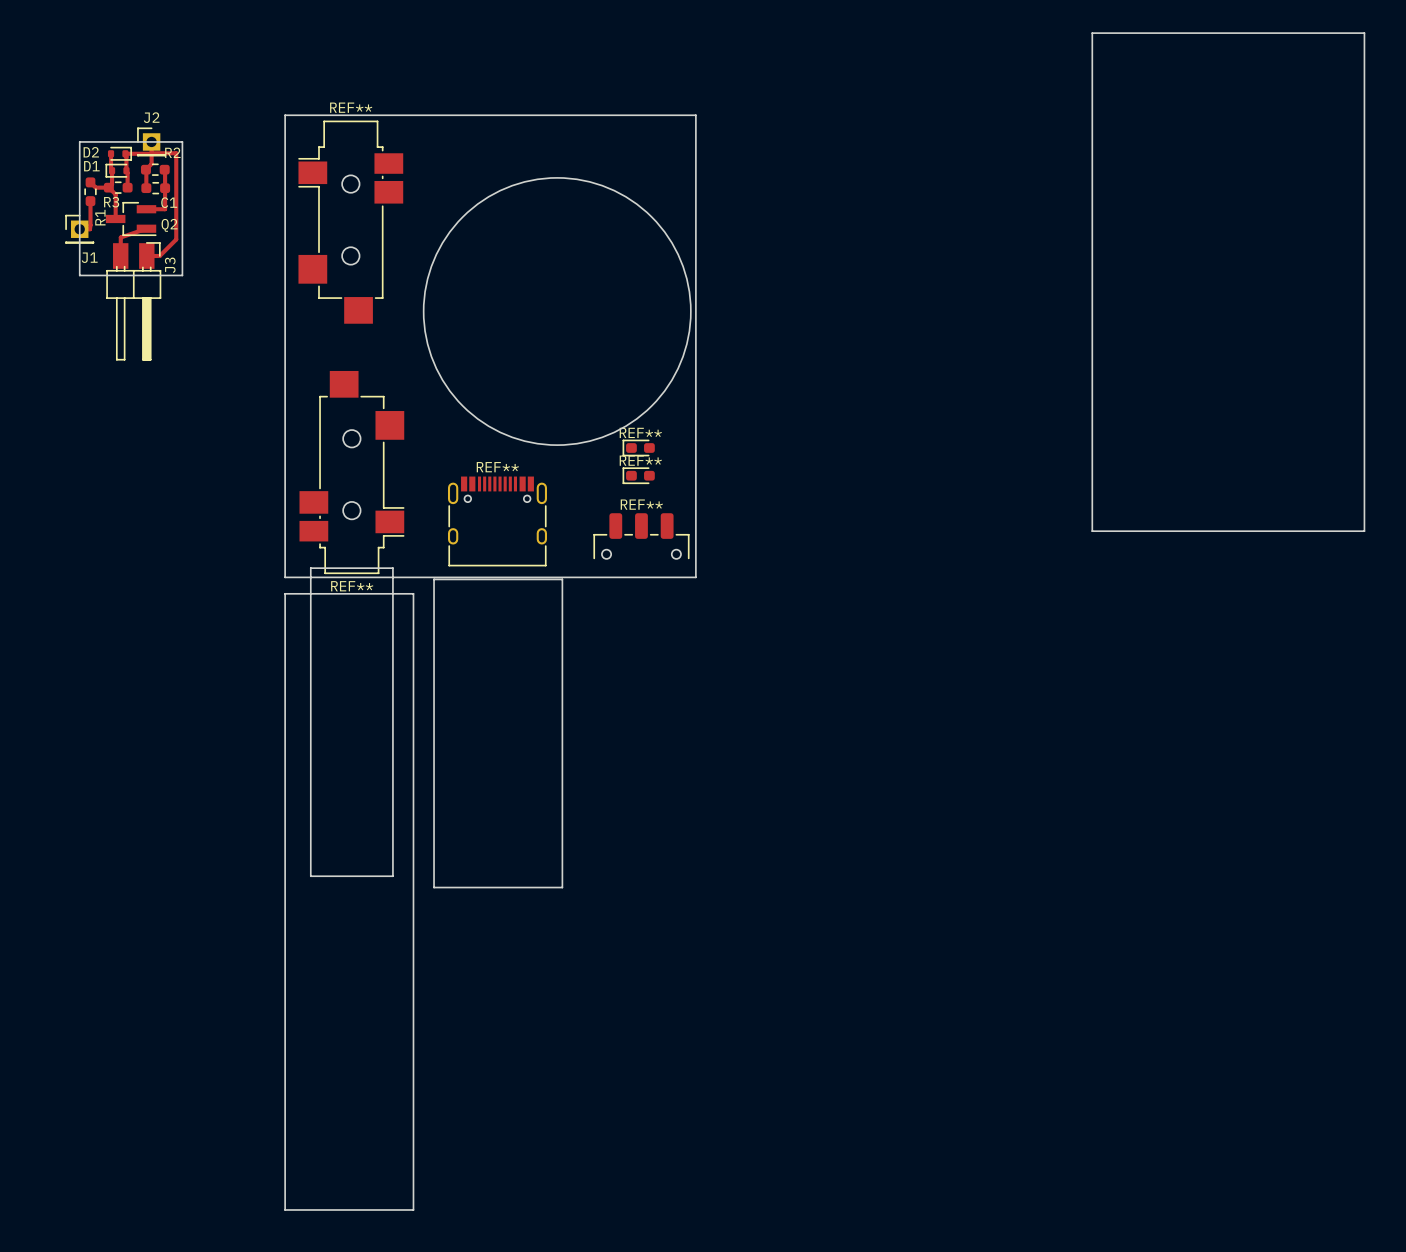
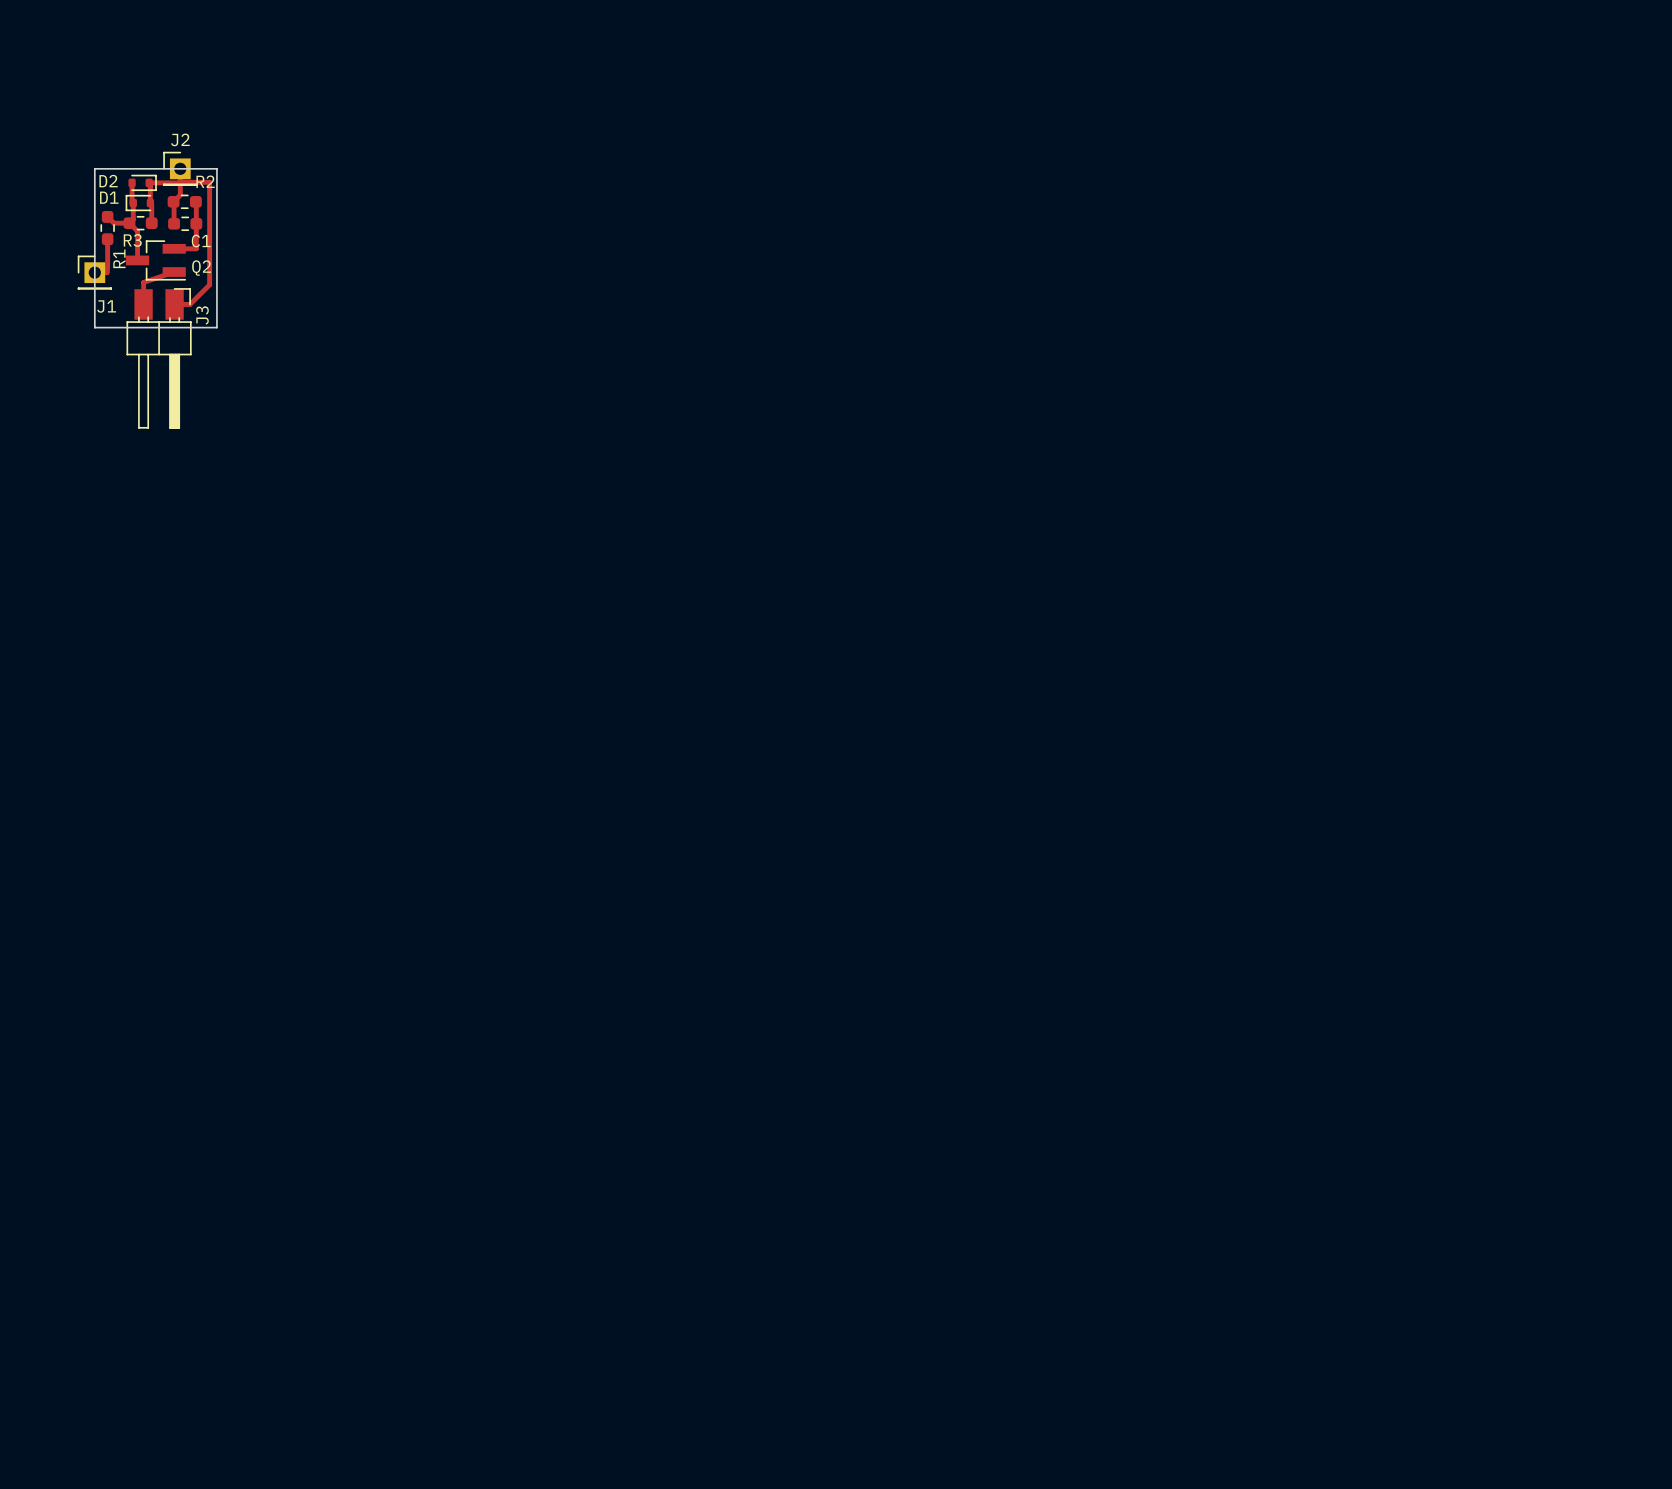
board edge: (1092, 33) (1364, 33) (1364, 531) (1092, 531) (1092, 33) -> none
board edge: (285, 115) (285, 577) (695, 577) (695, 115) (285, 115) -> none
round board edge: [423, 177, 692, 446] -> none
REF**: (350, 222) -> none
REF**: (638, 447) -> none
REF**: (351, 472) -> none
REF**: (638, 475) -> none
REF**: (497, 521) -> none
REF**: (641, 536) -> none
board edge: (310, 568) (392, 568) (392, 876) (310, 876) (310, 568) -> none
board edge: (434, 579) (562, 579) (562, 887) (434, 887) (434, 579) -> none
board edge: (285, 593) (413, 593) (413, 1209) (285, 1209) (285, 593) -> none

